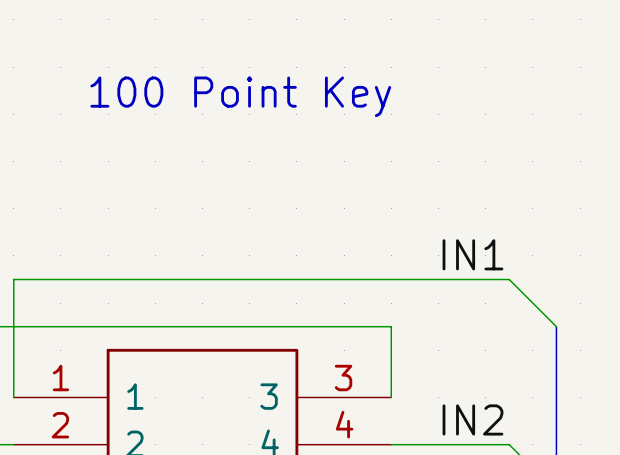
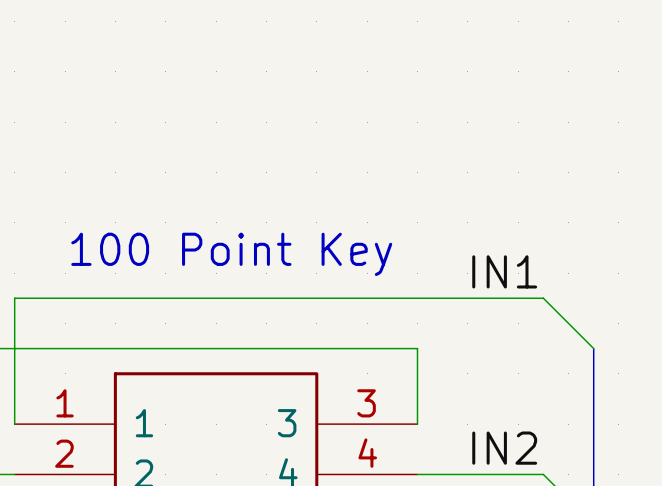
text position: 100 Point Key (240, 96) -> 100 Point Key (231, 254)

